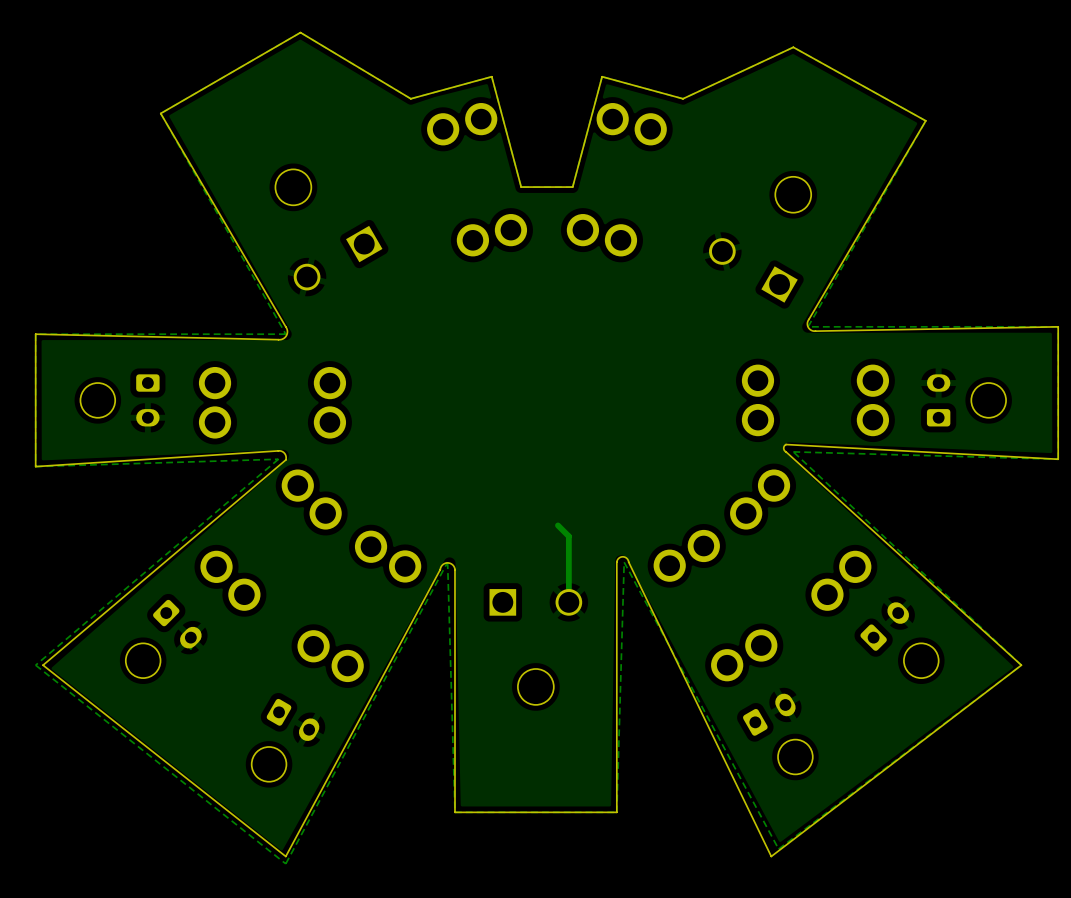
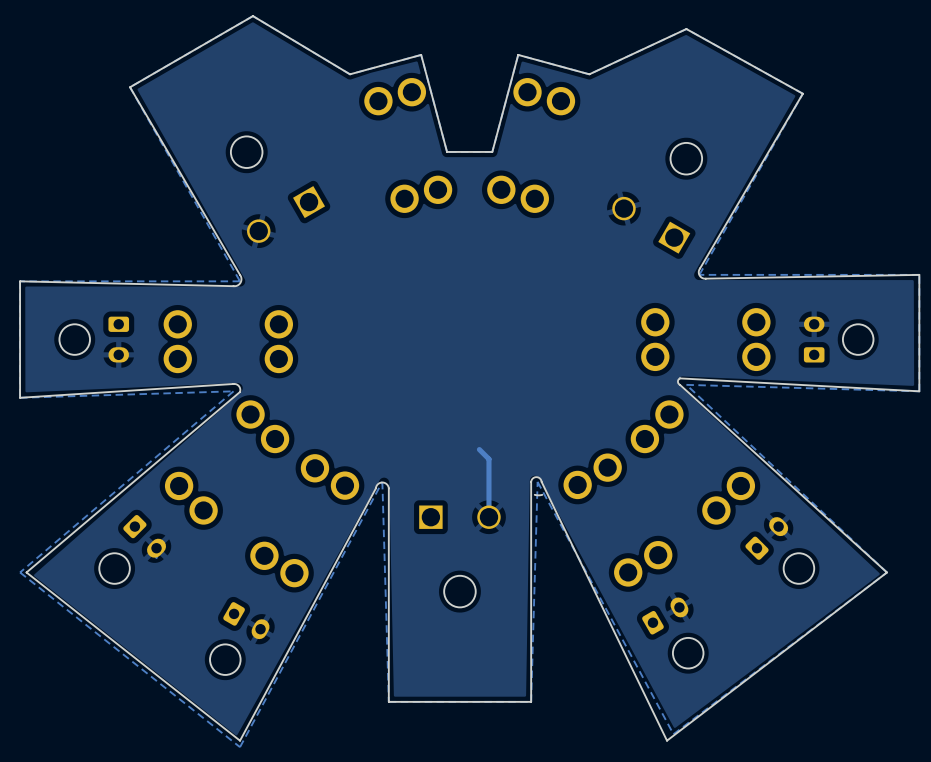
board edge: none -> (542, 494) (534, 494)

